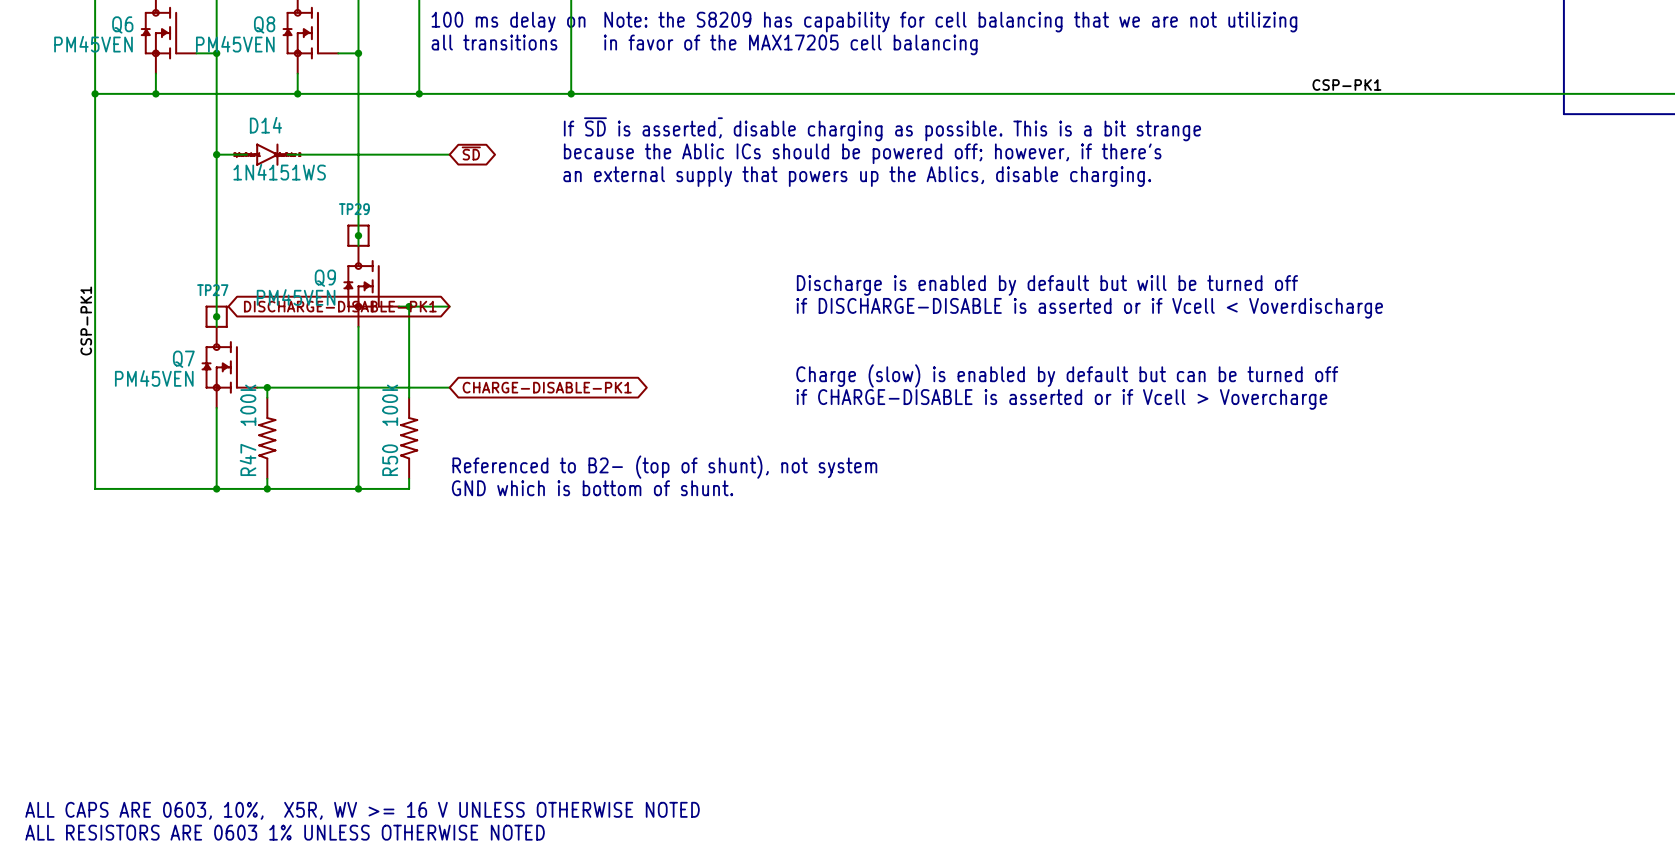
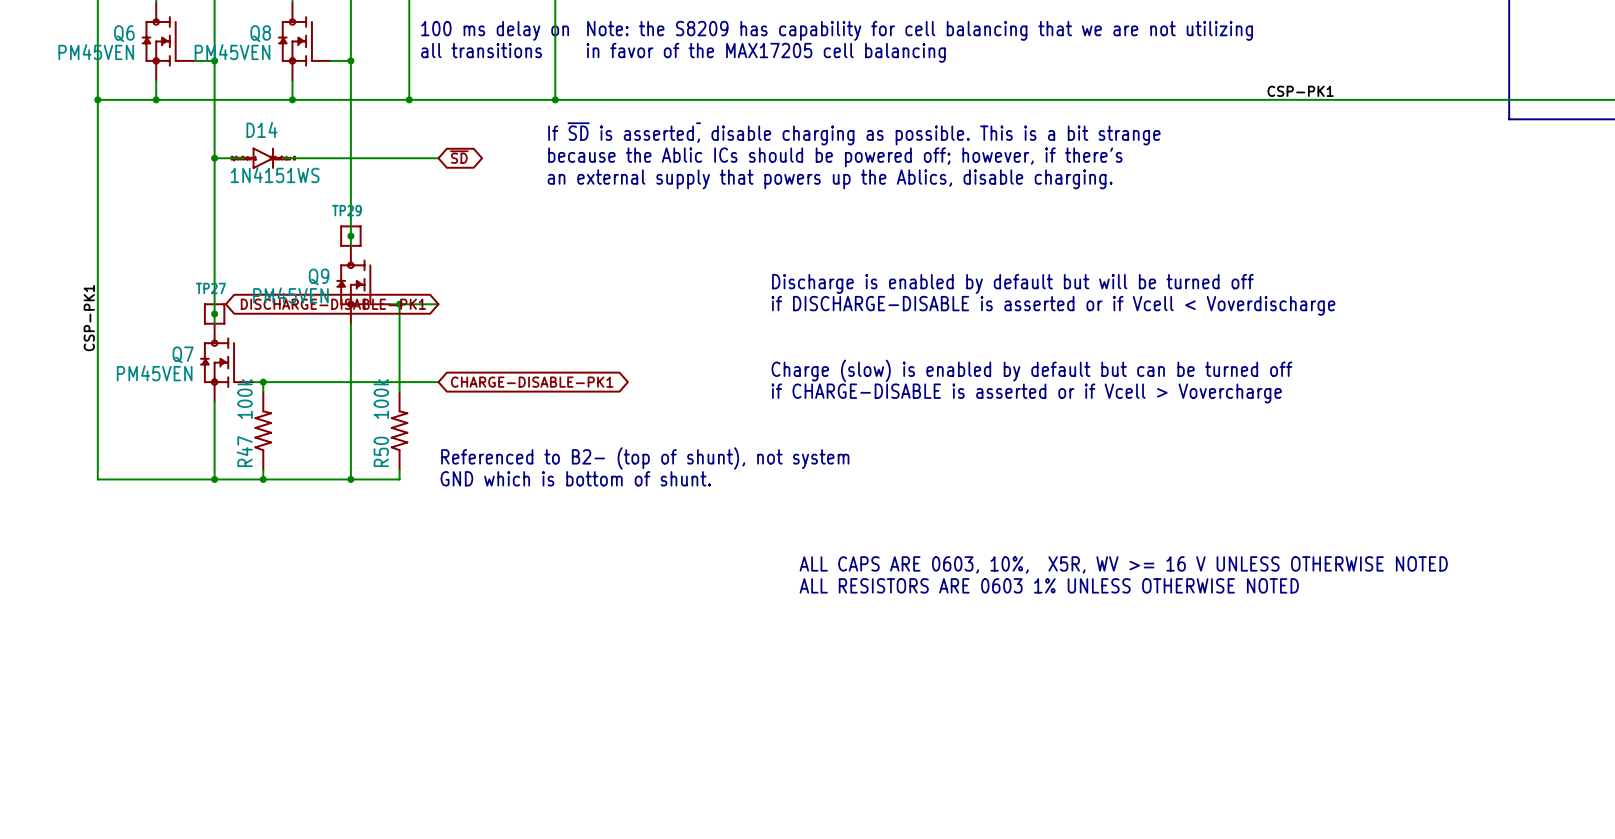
text: none -> ALL CAPS ARE 0603, 10%, X5R, WV >= 16 V UNLESS OTHERWISE NOTED (1123, 564)
text: none -> ALL RESISTORS ARE 0603 1% UNLESS OTHERWISE NOTED (1049, 585)
text: ALL CAPS ARE 0603, 10%, X5R, WV >= 16 V UNLESS OTHERWISE NOTED (362, 810) -> none
text: ALL RESISTORS ARE 0603 1% UNLESS OTHERWISE NOTED (285, 832) -> none

